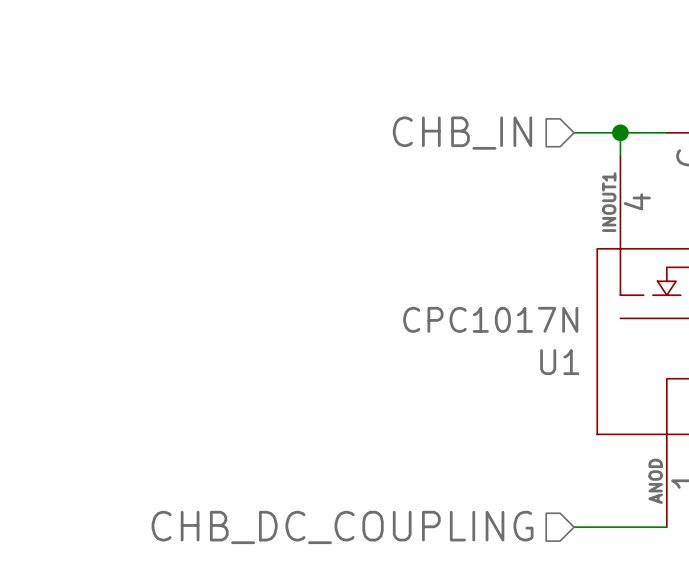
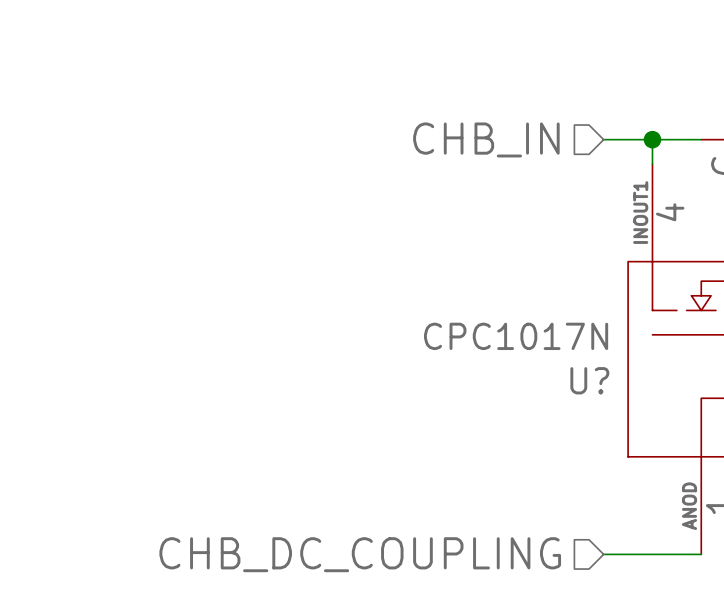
U1 name: U1 (559, 362) -> U? (589, 380)

